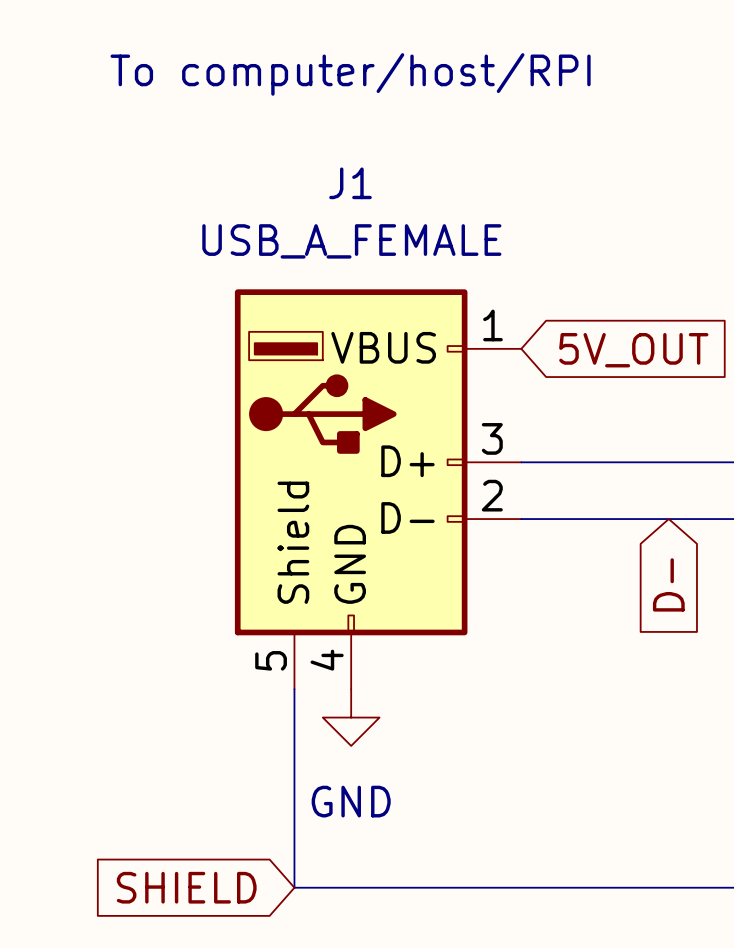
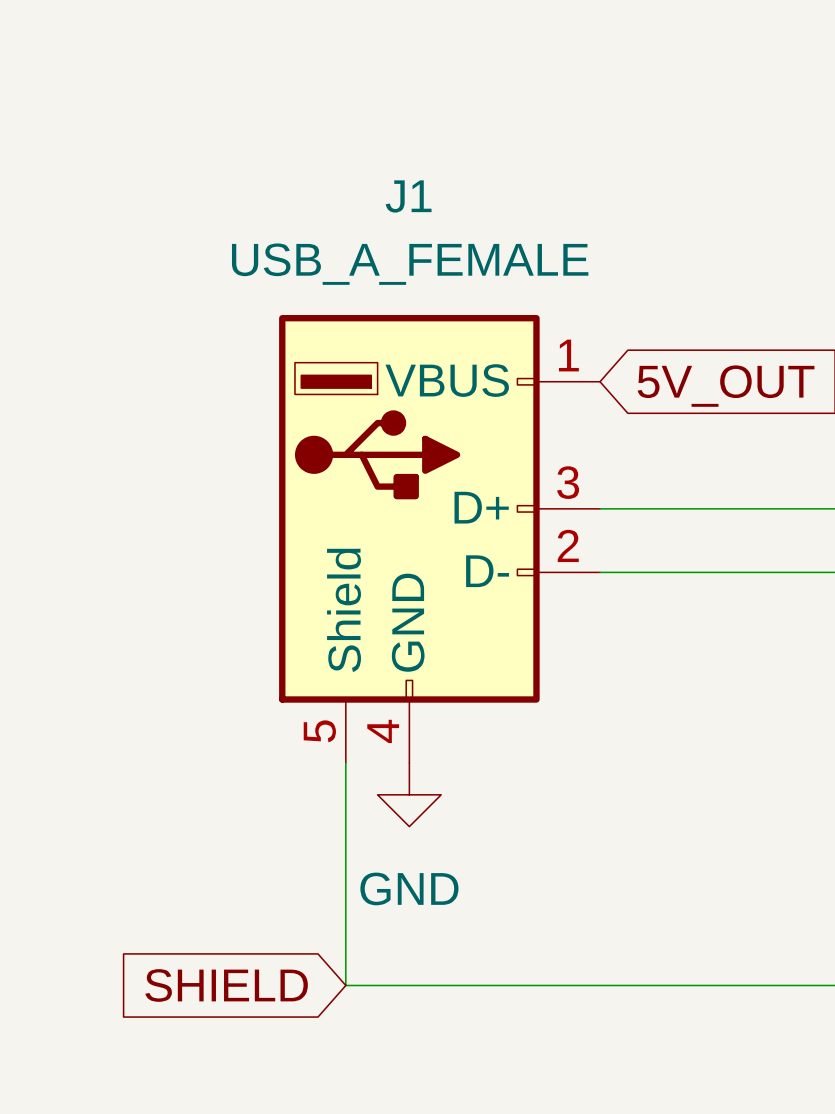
text: To computer/host/RPI (350, 74) -> none
global label: D- (668, 584) -> none

